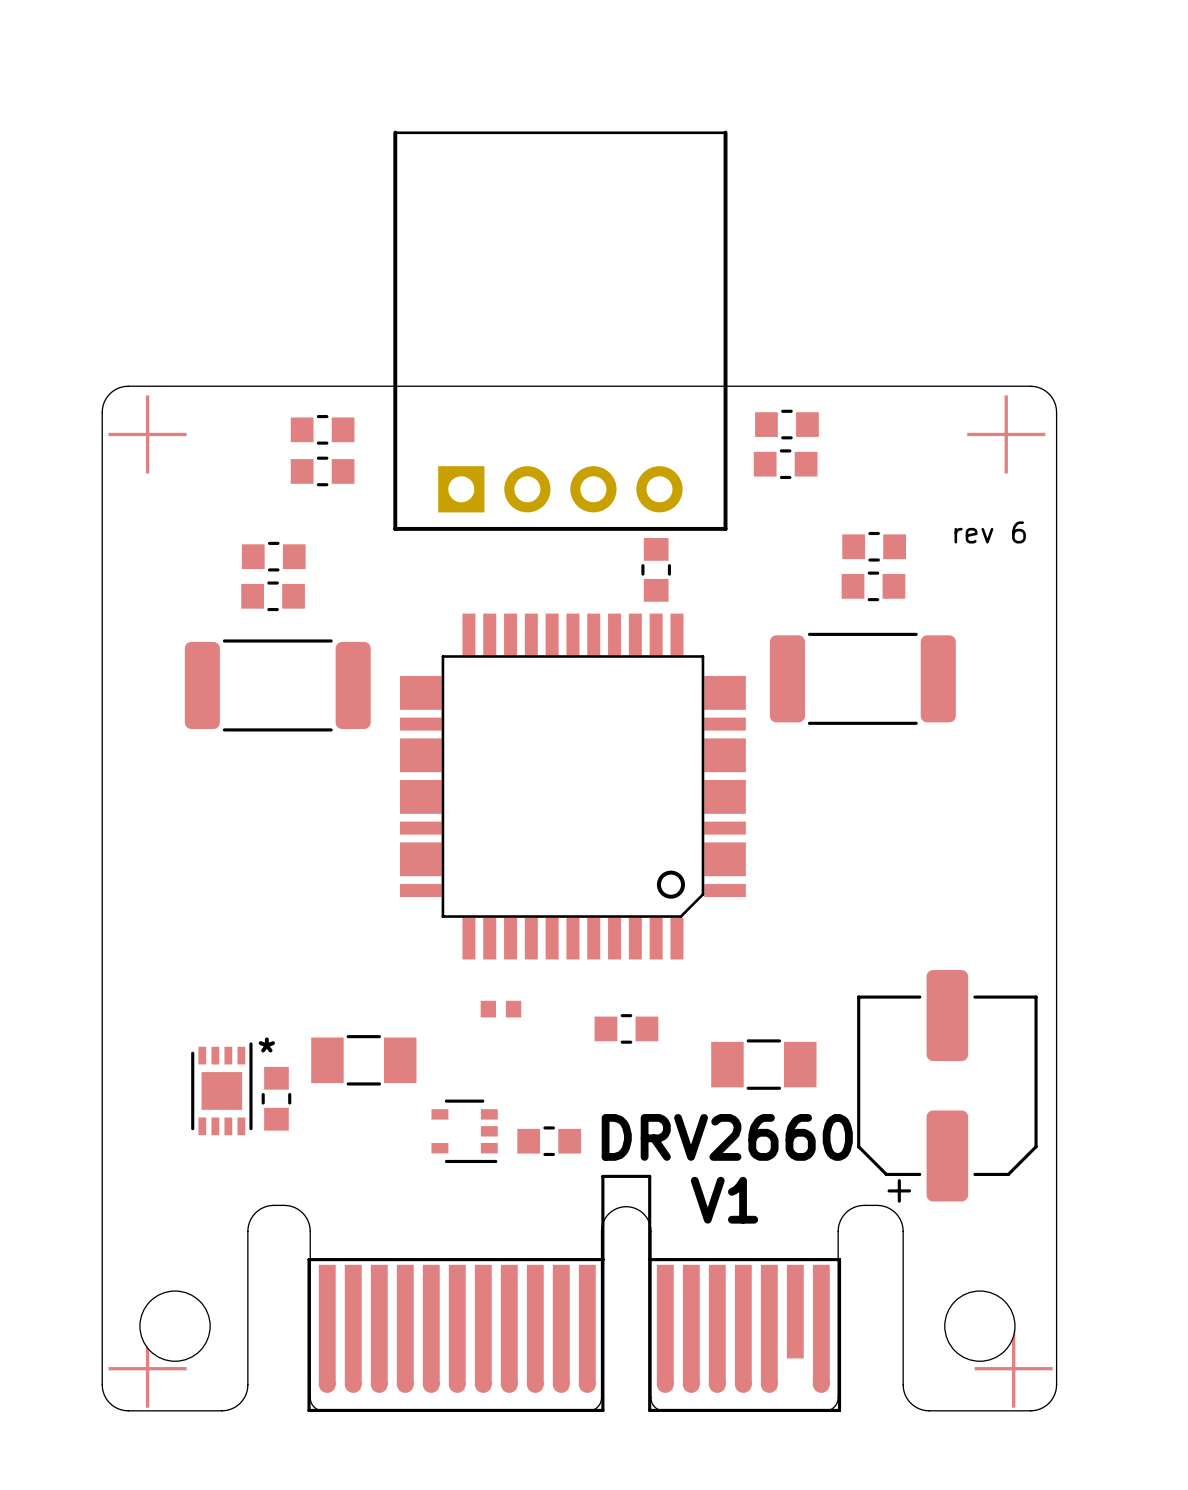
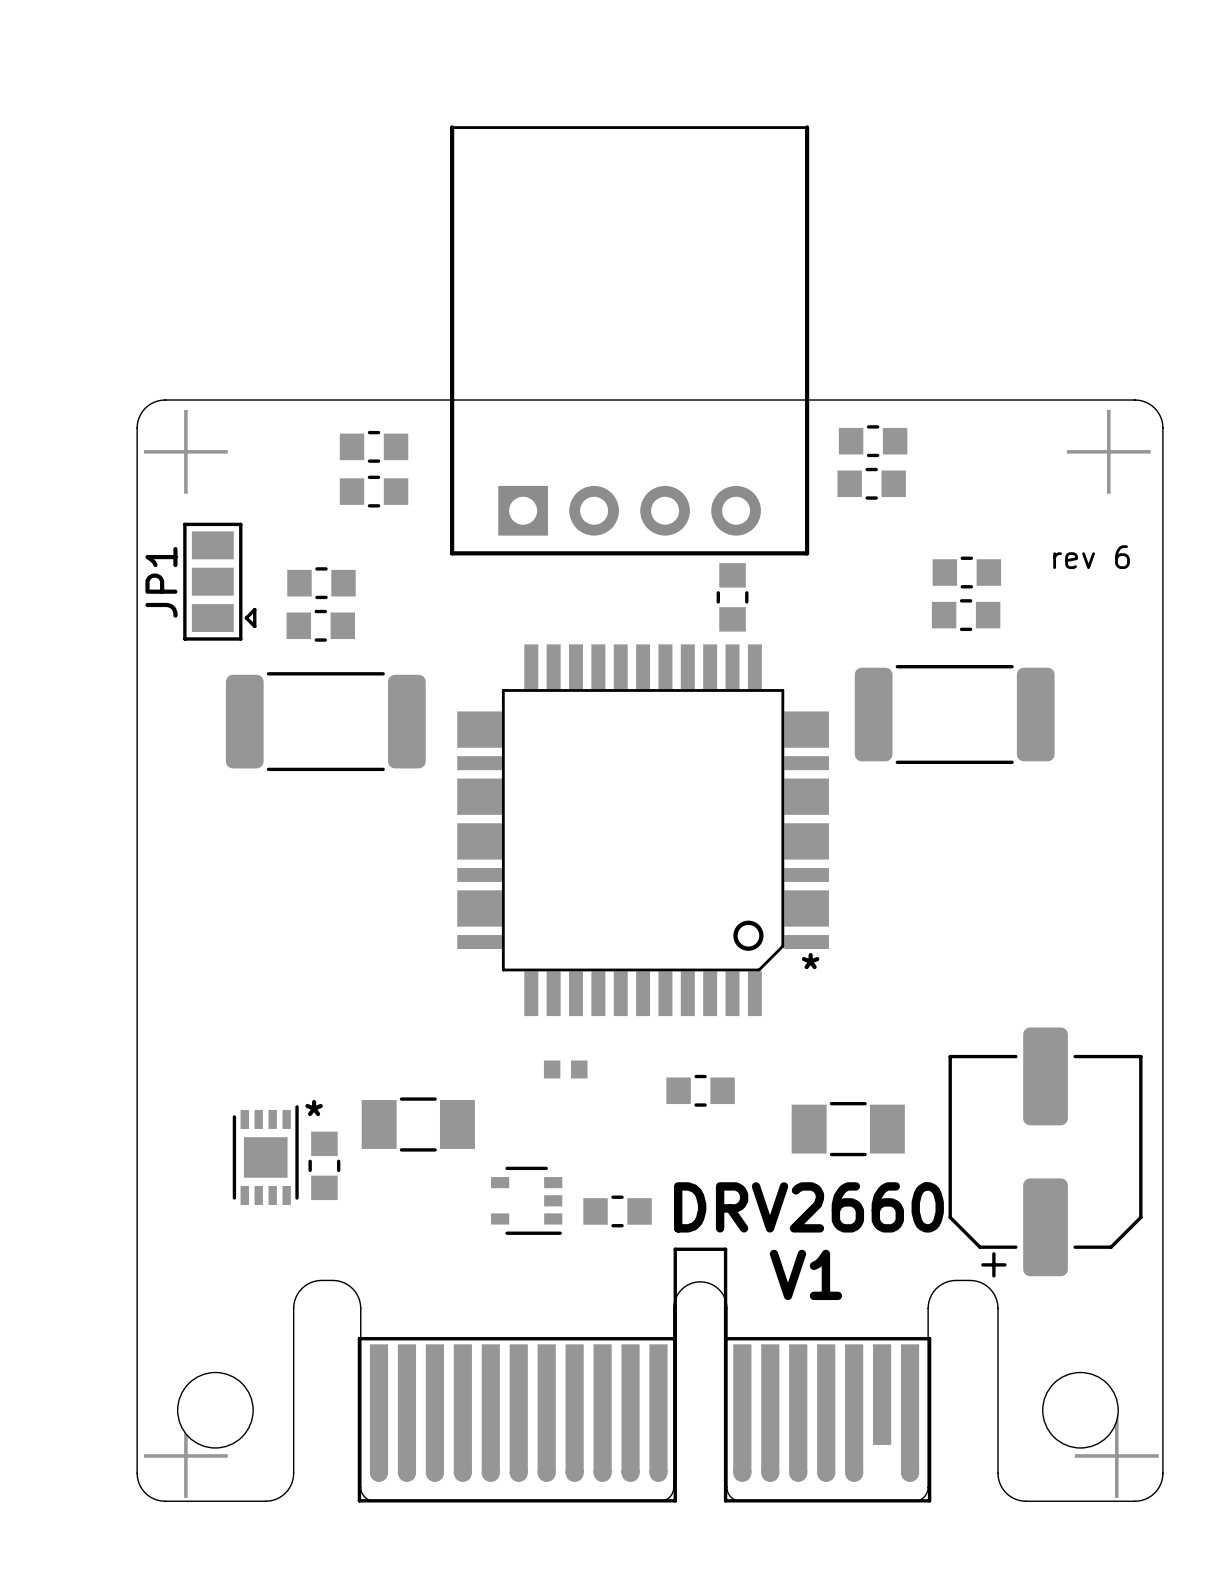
JP1: none -> (219, 581)
text: none -> * (810, 961)

